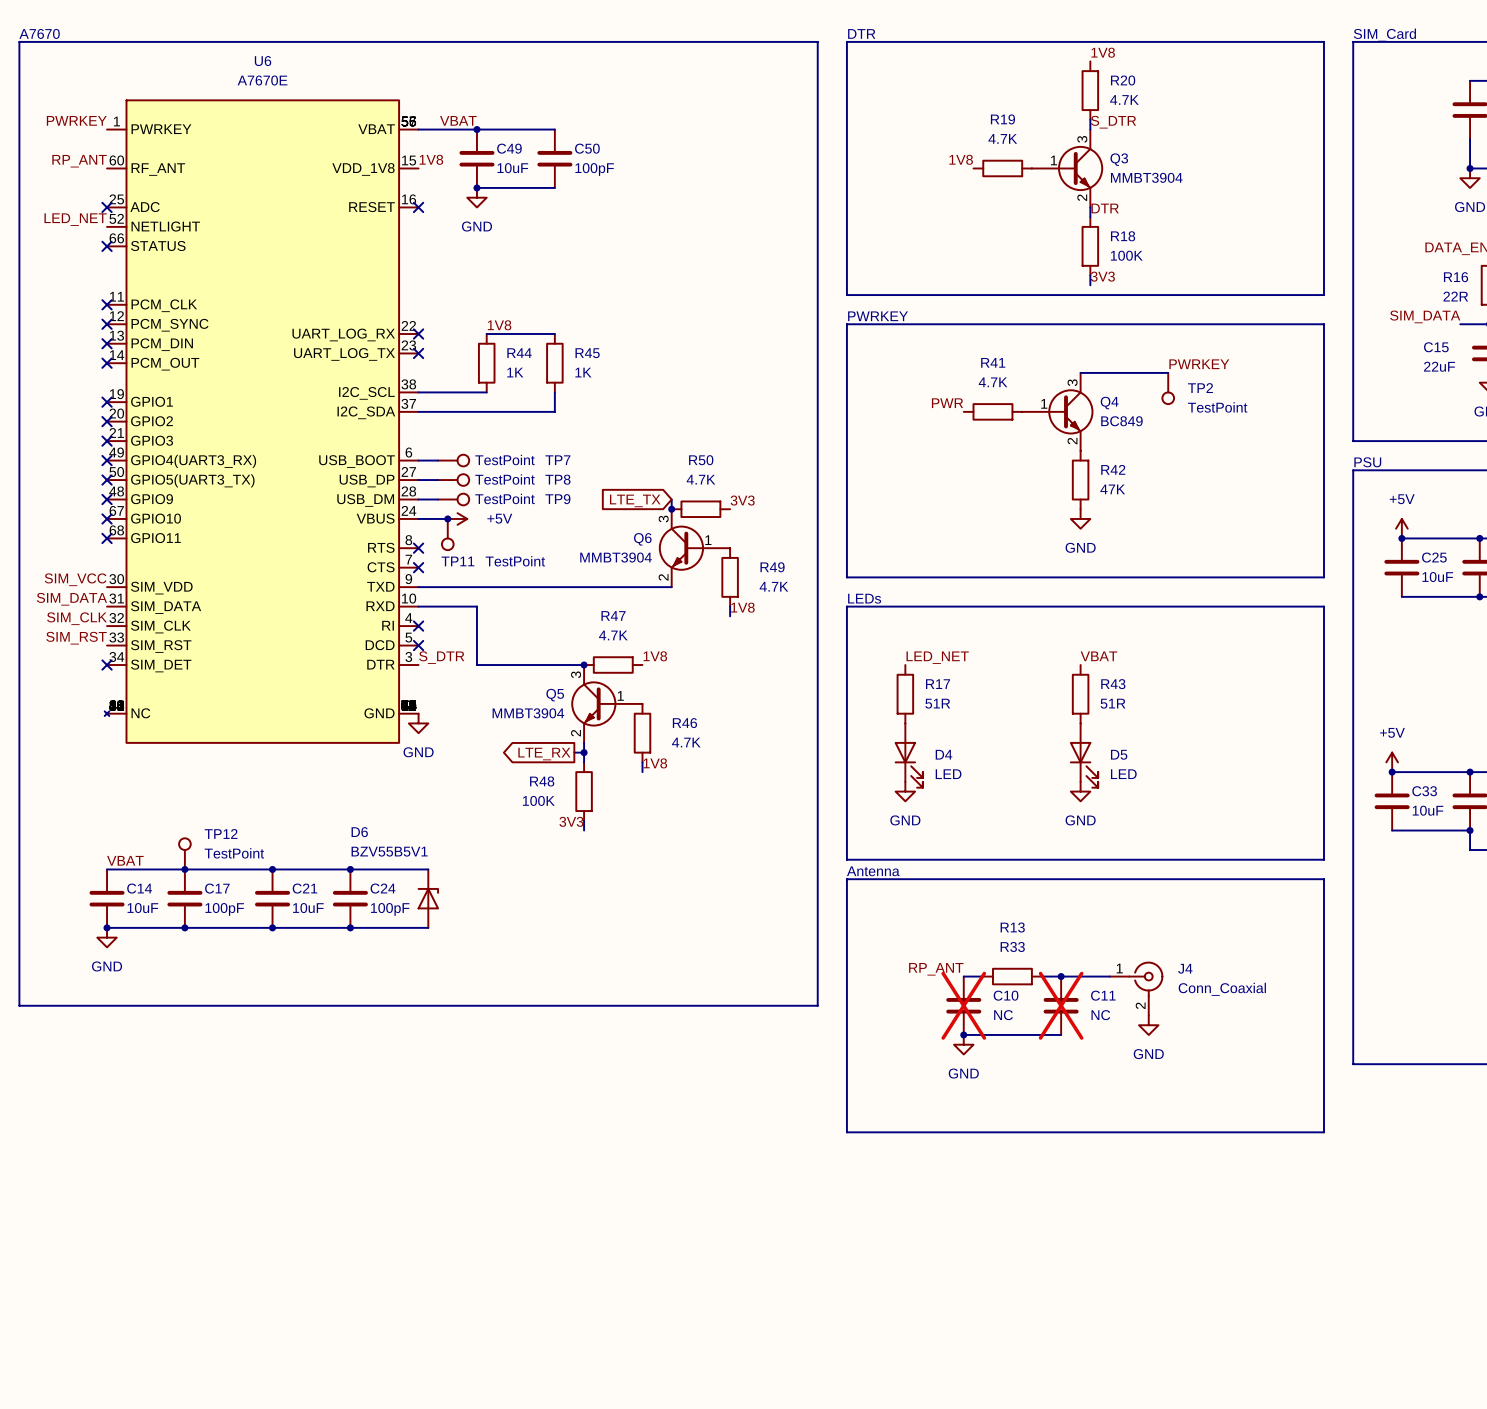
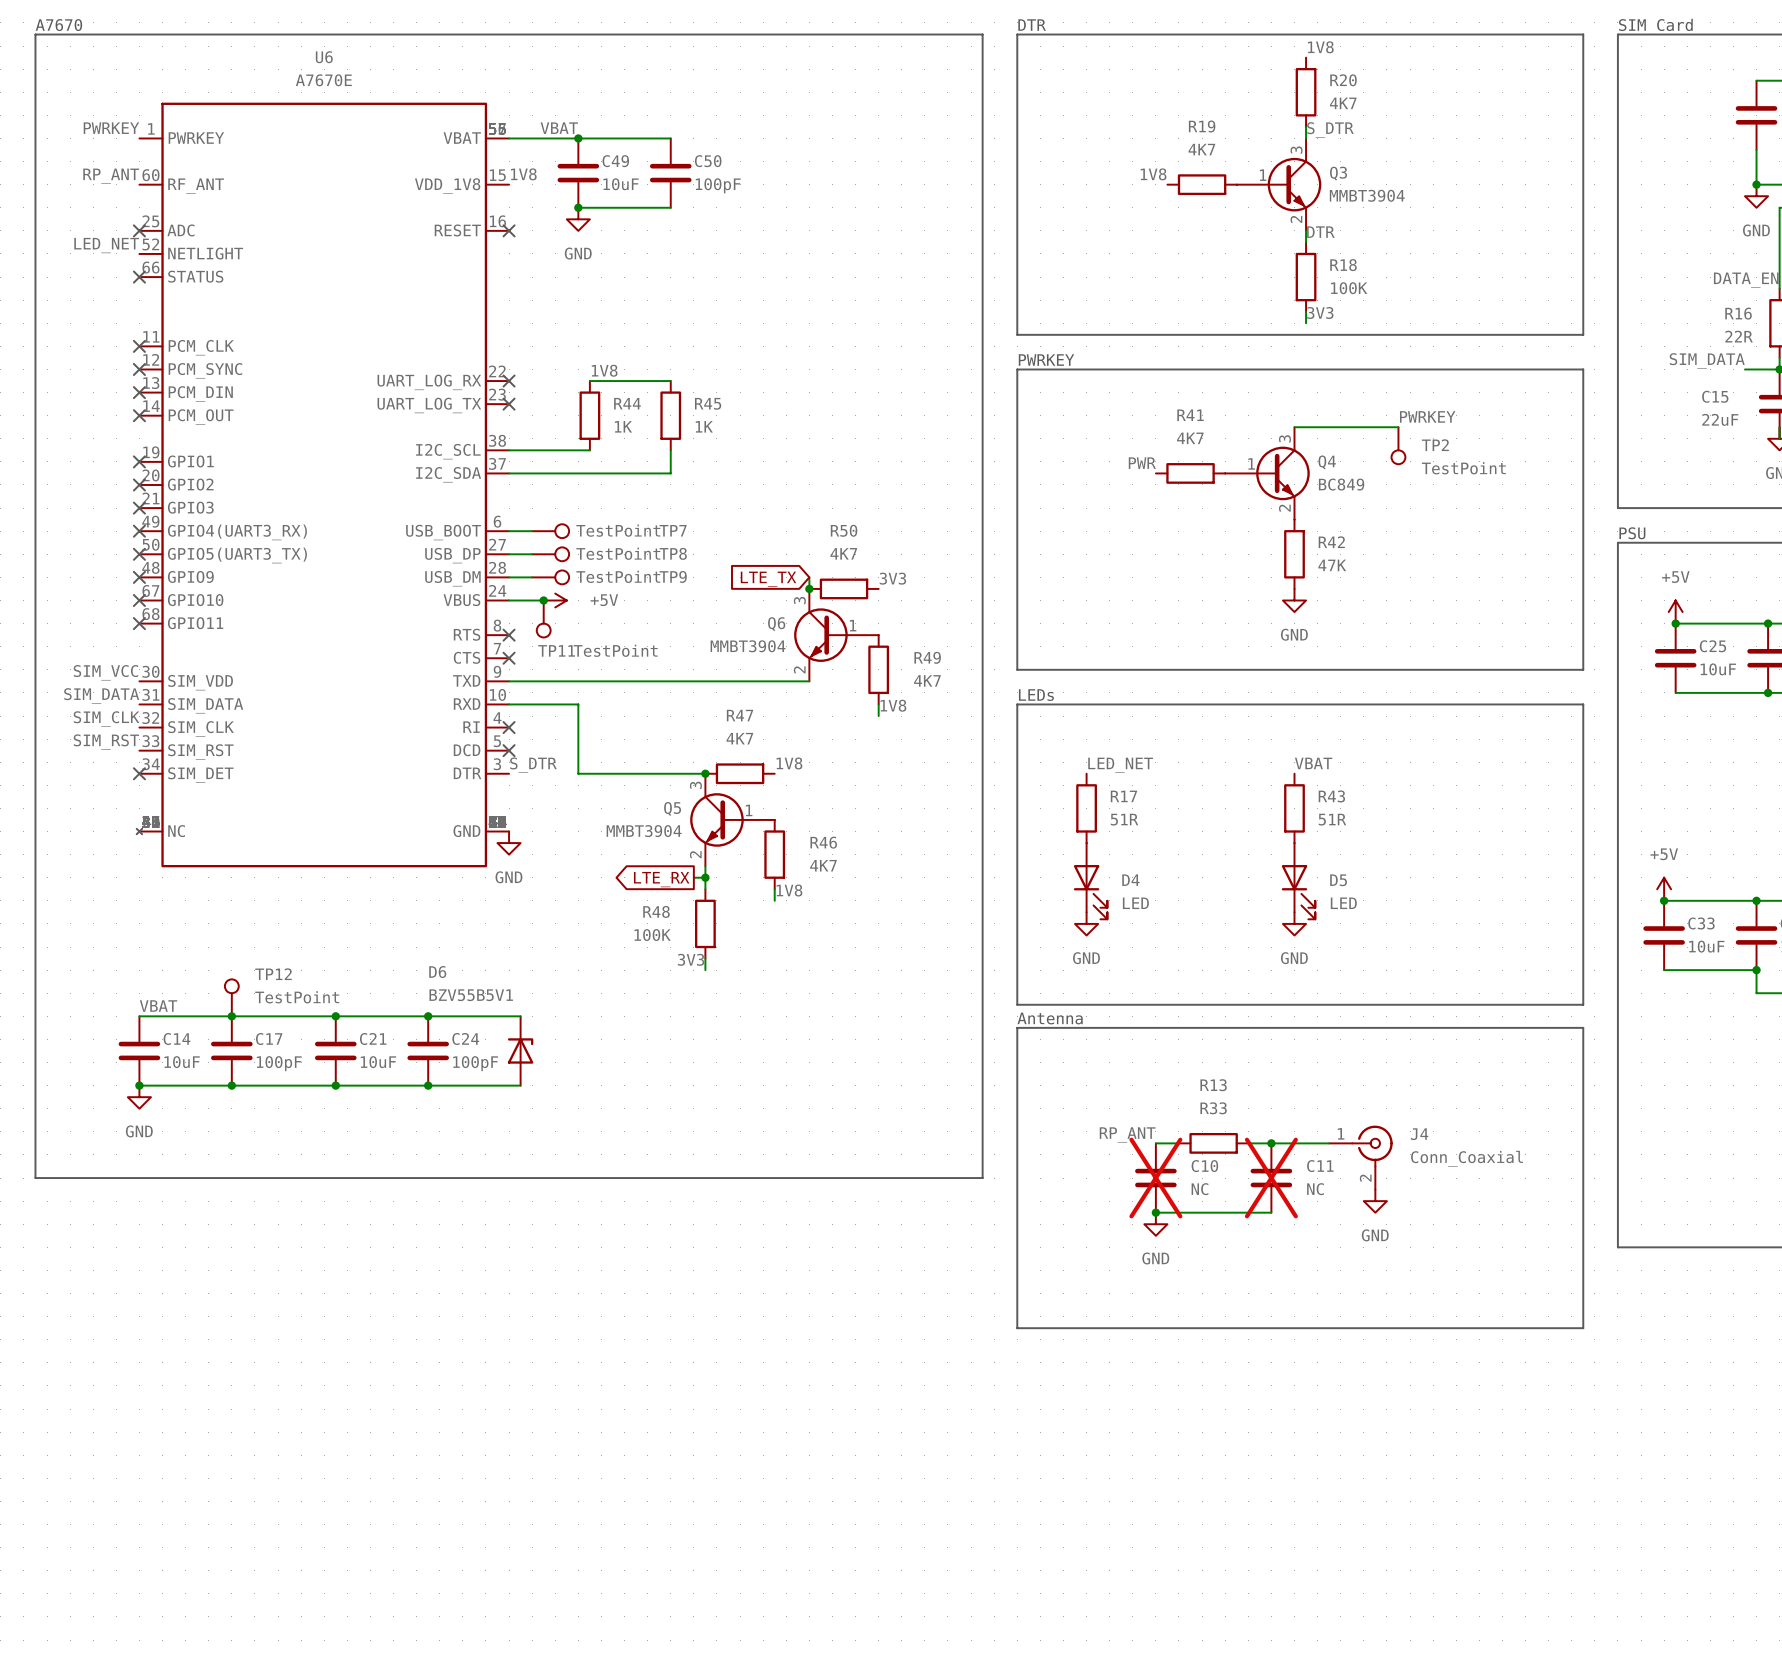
R20 value: 4.7K (1124, 99) -> 4K7 (1343, 103)
R19 value: 4.7K (1002, 138) -> 4K7 (1201, 149)
R41 value: 4.7K (993, 382) -> 4K7 (1190, 438)
R50 value: 4.7K (700, 479) -> 4K7 (843, 553)
R49 value: 4.7K (773, 586) -> 4K7 (927, 680)
R47 value: 4.7K (613, 635) -> 4K7 (739, 738)
R46 value: 4.7K (686, 742) -> 4K7 (823, 865)

